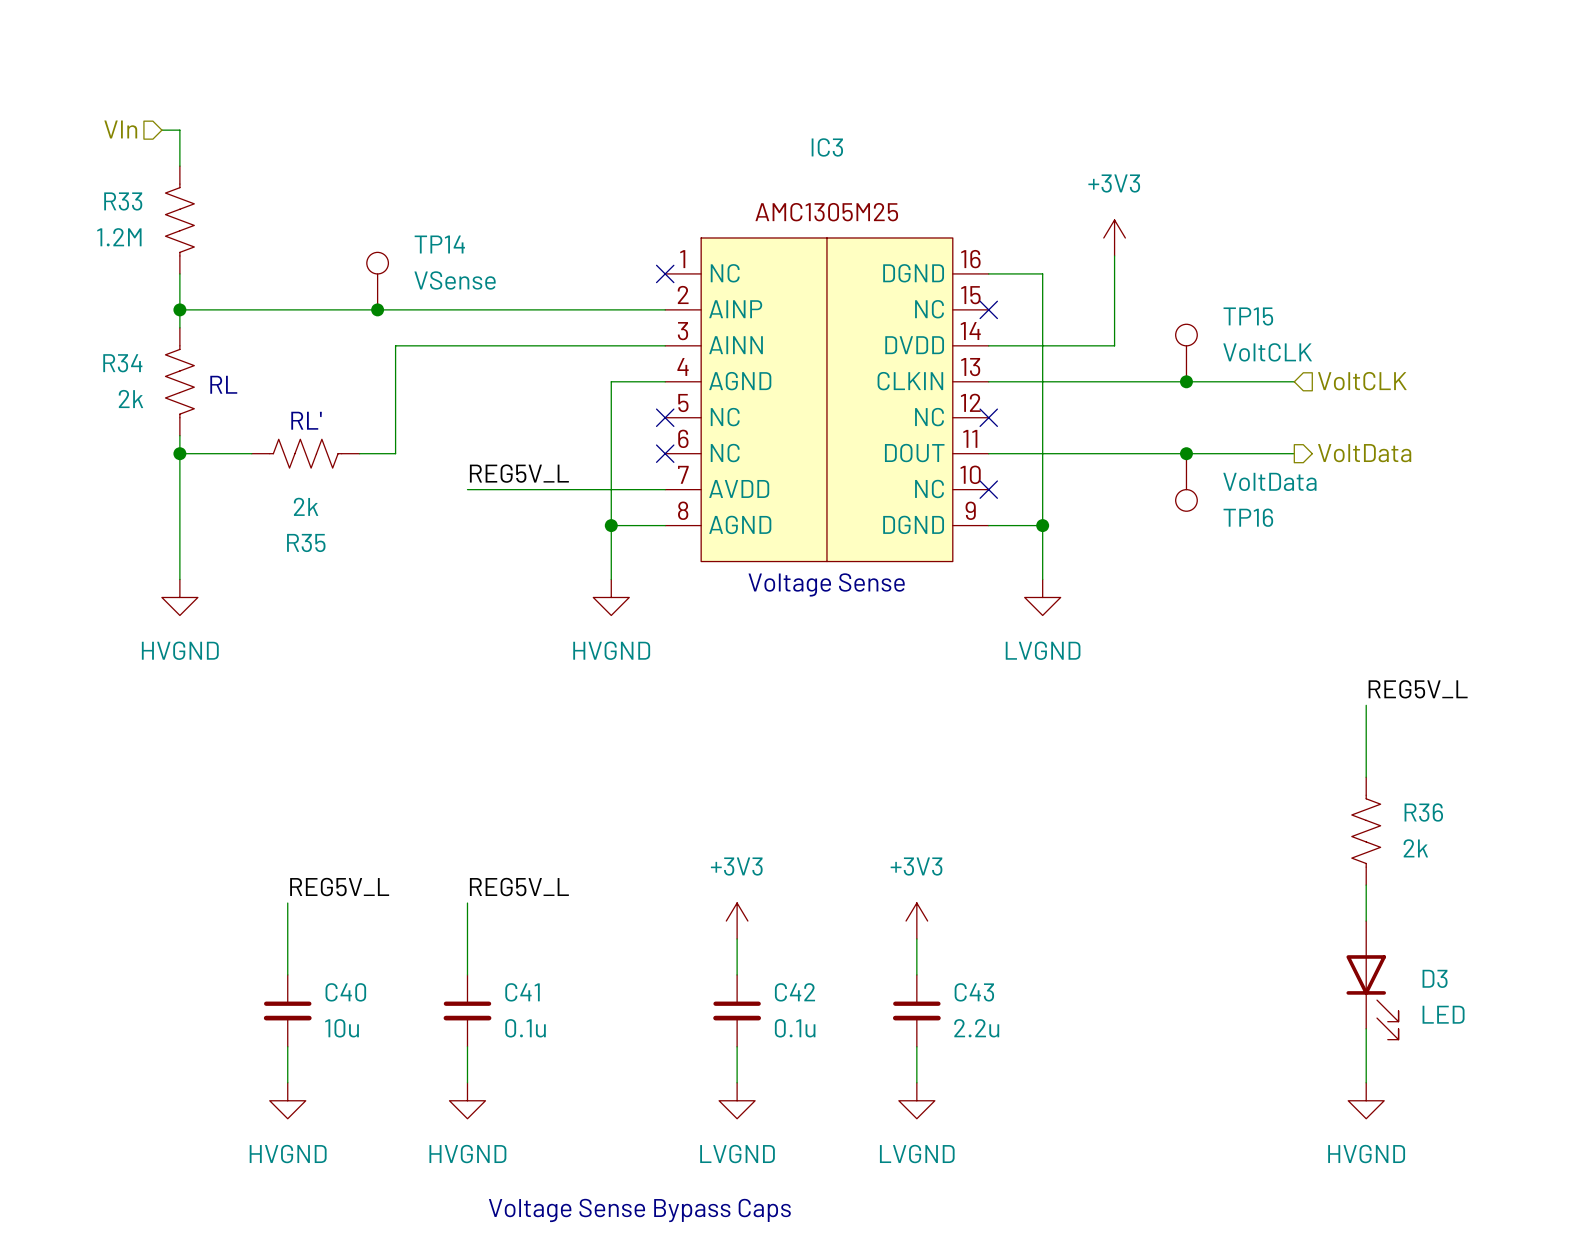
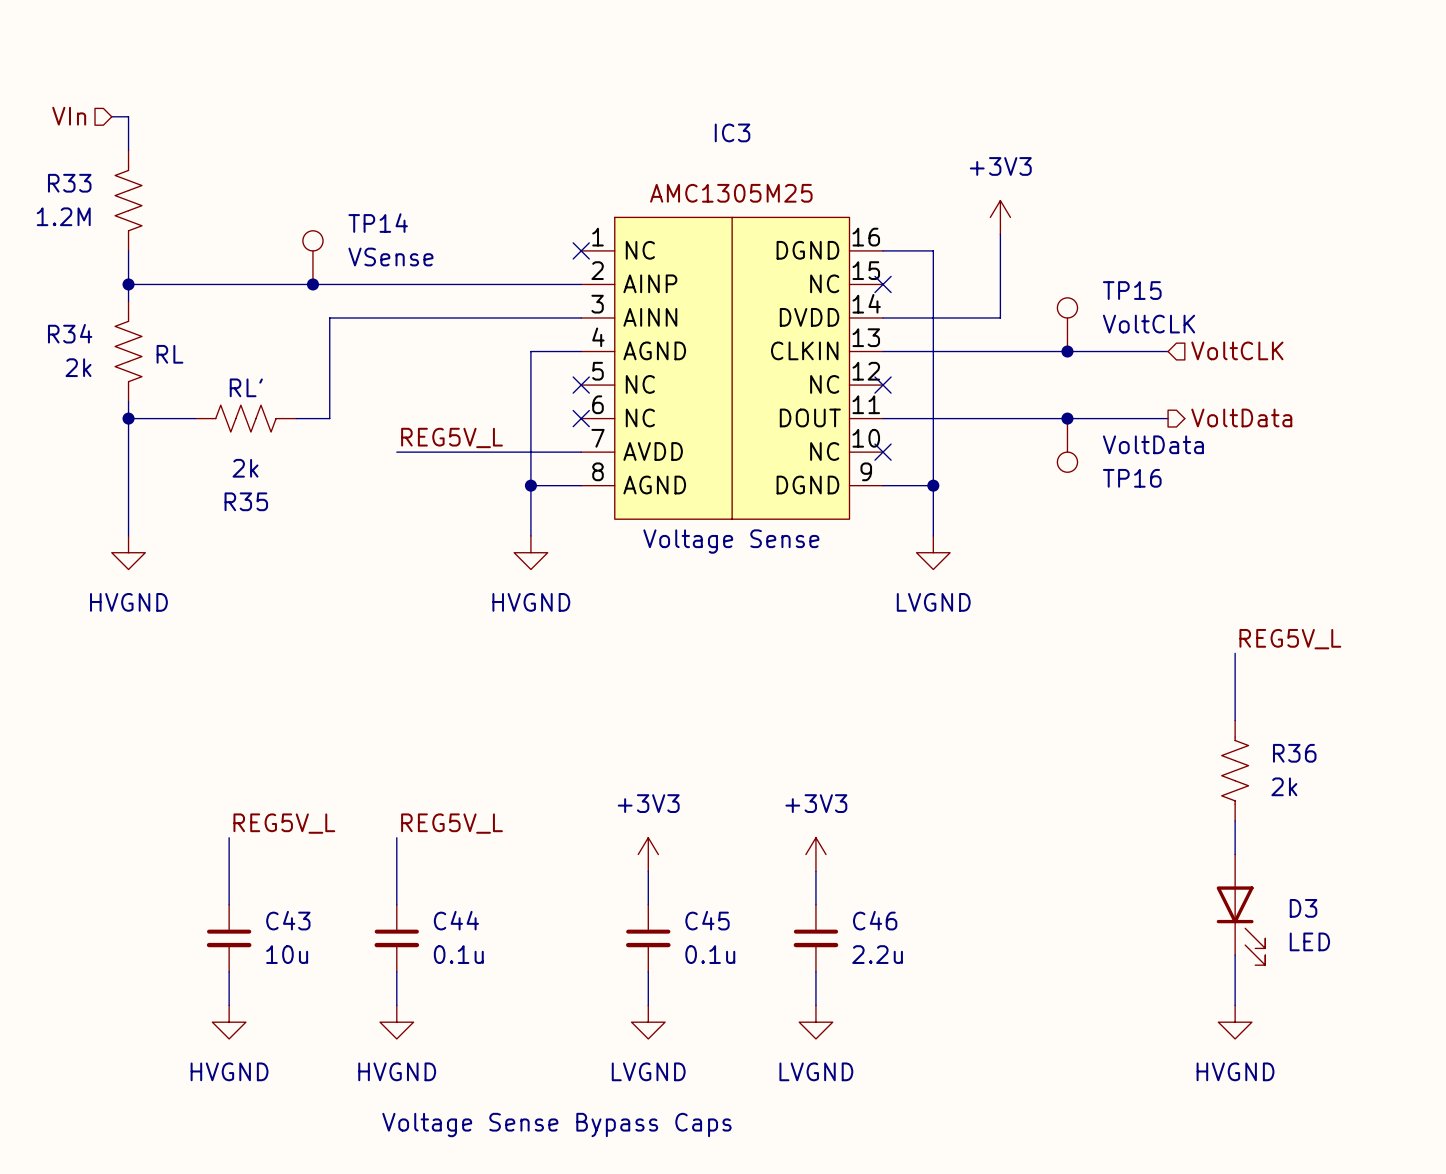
C40 name: C40 (345, 992) -> C43 (288, 920)
C41 name: C41 (522, 992) -> C44 (456, 920)
C42 name: C42 (794, 992) -> C45 (707, 920)
C43 name: C43 (974, 992) -> C46 (875, 920)

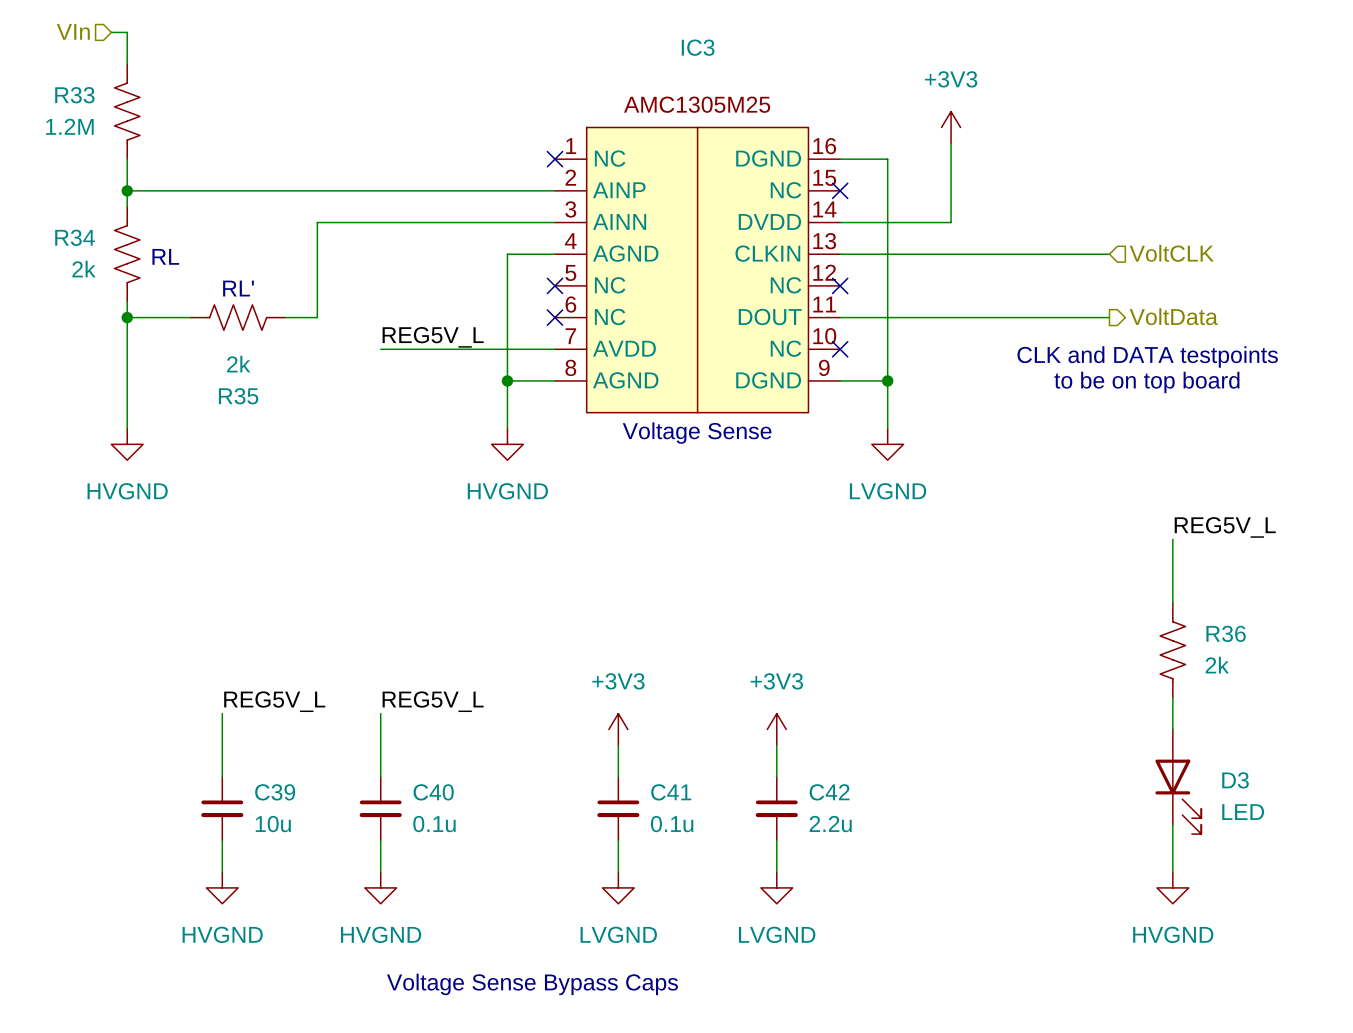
TP14: VSense (312, 257) -> none
junction: (312, 284) -> none
TP15: VoltCLK (1067, 324) -> none
junction: (1067, 351) -> none
junction: (1067, 418) -> none
TP16: VoltData (1067, 445) -> none
text: none -> CLK and DATA testpoints (1147, 356)
text: none -> to be on top board (1146, 382)
C43 name: C43 (288, 920) -> C39 (275, 792)
C44 name: C44 (456, 920) -> C40 (433, 792)
C45 name: C45 (707, 920) -> C41 (671, 792)
C46 name: C46 (875, 920) -> C42 (829, 792)

